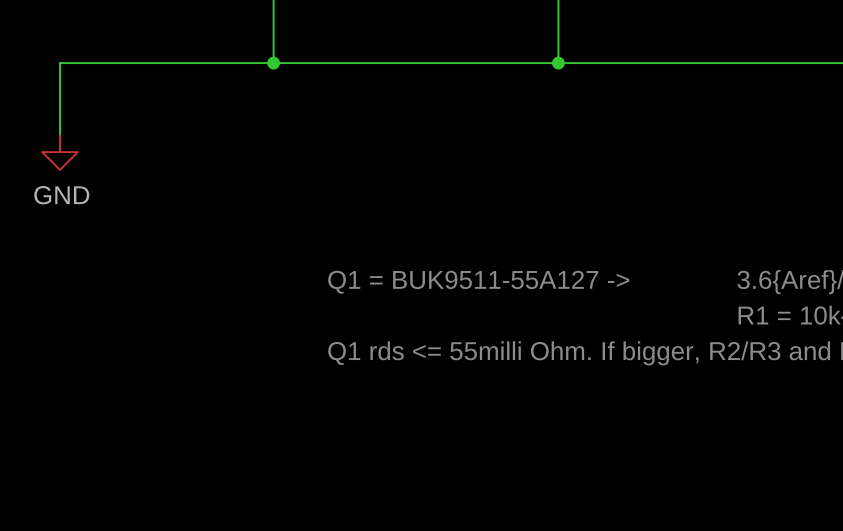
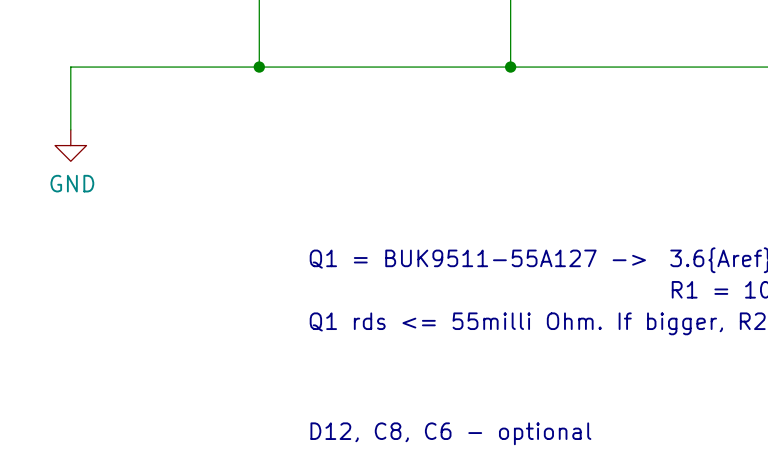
text: none -> D12, C8, C6 - optional (450, 433)

